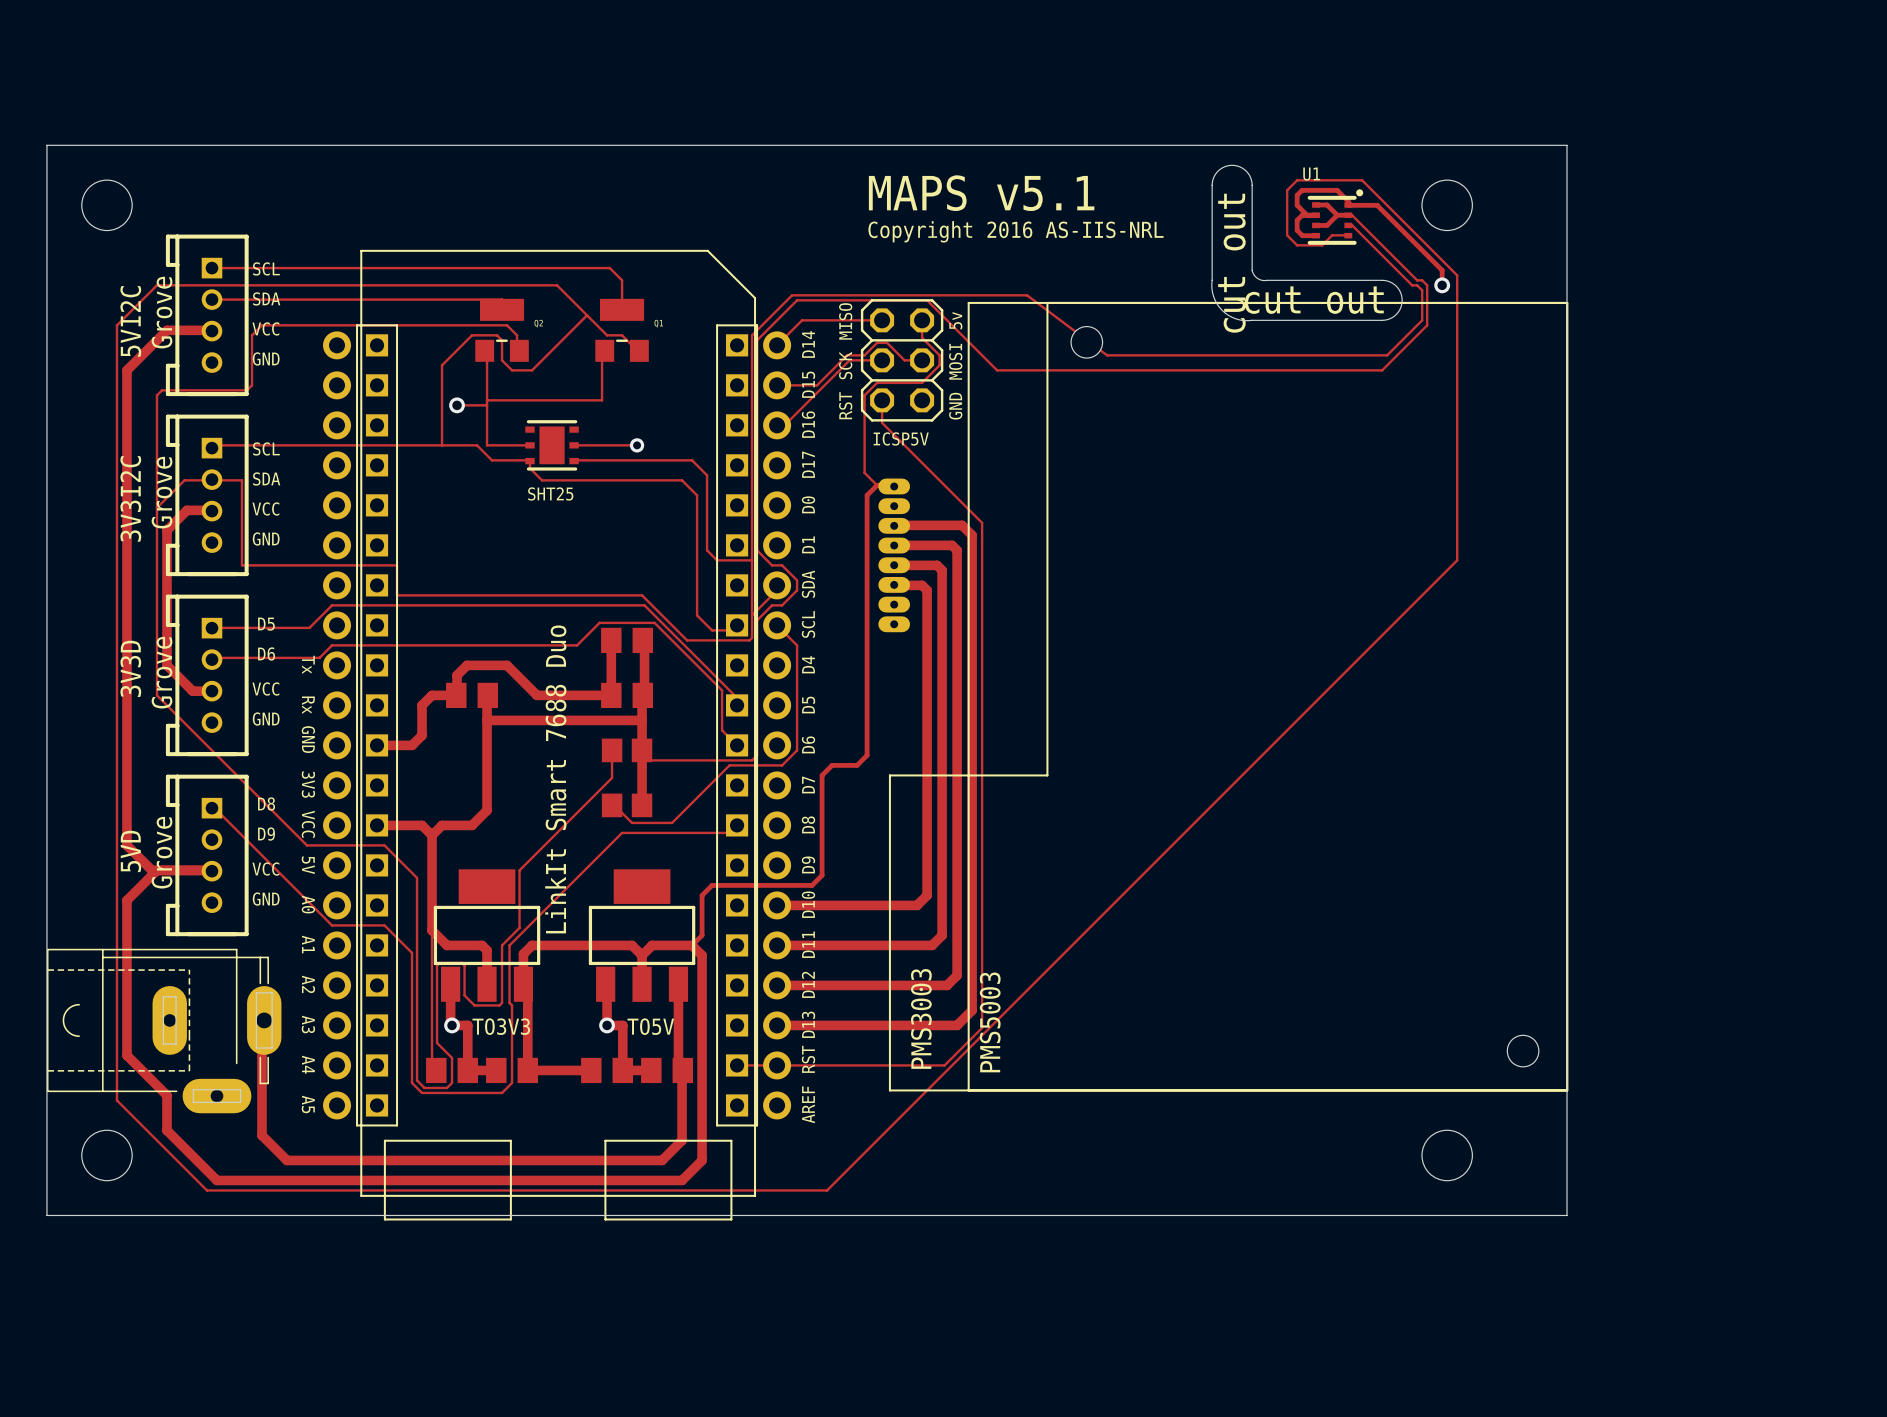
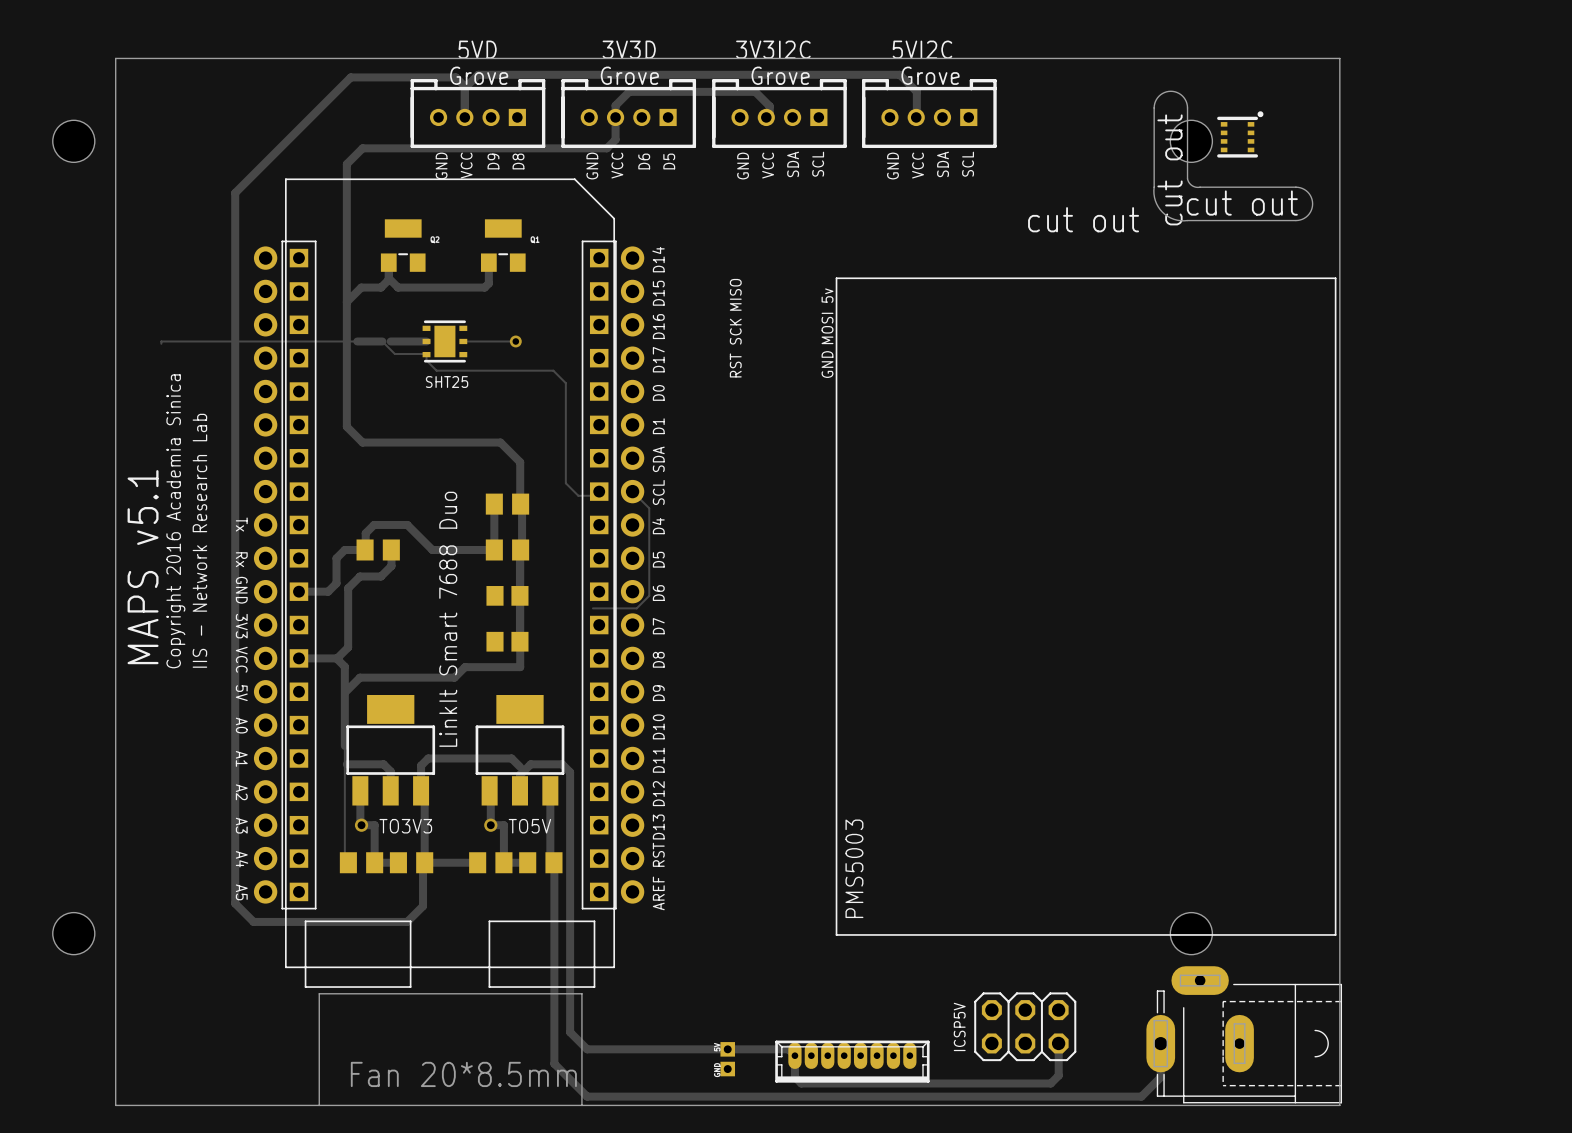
track: none -> (464, 88) (478, 74) (899, 74) (916, 91) (916, 117)
board edge: (1567, 145) (1567, 1215) (46, 1215) (46, 145) (1567, 145) -> (115, 58) (115, 1105) (1339, 1105) (1339, 58) (115, 58)
track: none -> (464, 117) (464, 86) (455, 77) (350, 77) (235, 193) (235, 903) (253, 921) (407, 921) (423, 906) (423, 864) (424, 862)
track: none -> (766, 117) (769, 114) (769, 106) (755, 91) (629, 91) (615, 105) (615, 139) (606, 148) (362, 148) (346, 164) (346, 426) (362, 442) (500, 442) (520, 462) (520, 504)
board edge: (1212, 185) (1211, 288) (1217, 303) (1228, 315) (1243, 320) (1382, 320) (1392, 317) (1398, 312) (1402, 302) (1400, 292) (1394, 284) (1387, 281) (1263, 280) (1257, 278) (1252, 270) (1250, 177) (1242, 168) (1234, 165) (1226, 166) (1216, 173) (1212, 185) -> (1154, 107) (1153, 194) (1158, 206) (1167, 216) (1180, 220) (1295, 220) (1304, 218) (1309, 214) (1312, 206) (1311, 197) (1306, 190) (1300, 187) (1197, 187) (1192, 185) (1187, 178) (1186, 101) (1179, 93) (1166, 91) (1157, 97) (1154, 107)
text: MAPS v5.1 (981, 193) -> none
part: none -> (1240, 134)
track: (1316, 204) (1327, 204) (1337, 215) -> none
track: (1315, 215) (1302, 215) (1297, 220) (1297, 230) (1302, 235) (1316, 235) -> none
track: (1316, 215) (1307, 215) (1297, 205) (1297, 195) (1302, 190) (1337, 190) (1348, 201) (1348, 205) (1377, 205) (1442, 270) (1442, 285) -> none
track: (1337, 215) (1327, 225) (1317, 225) -> none
track: (1337, 215) (1352, 215) (1417, 280) (1422, 280) (1427, 285) (1427, 325) (1382, 370) (997, 370) (927, 300) (797, 300) (757, 340) (757, 550) (772, 565) (782, 565) (797, 580) (797, 590) (782, 605) (772, 605) (757, 620) (757, 755) (752, 760) (642, 760) (642, 750) -> none
U1: (1335, 217) -> none
track: (1348, 225) (1352, 225) (1412, 285) (1417, 285) (1422, 290) (1422, 320) (1387, 355) (1107, 355) (1027, 295) (792, 295) (752, 335) (752, 637) (749, 640) (687, 640) (642, 595) (397, 595) (397, 565) (242, 565) (242, 480) (184, 480) (156, 507) -> none
text: Copyright 2016 AS-IIS-NRL (1015, 231) -> none
text: none -> D9 (493, 161)
text: none -> D8 (518, 161)
text: none -> D6 (644, 161)
text: none -> D5 (669, 161)
5VI2C footprint: [165, 234, 249, 397] -> [862, 79, 997, 149]
track: (1348, 235) (1332, 235) (1322, 245) (1297, 245) (1287, 235) (1287, 190) (1297, 180) (1362, 180) (1457, 275) (1457, 560) (827, 1190) (206, 1190) (116, 1100) (116, 325) (156, 285) (557, 285) (607, 335) (622, 335) (639, 350) -> none
text: none -> cut out (1170, 169)
text: cut out (1231, 263) -> none
track: (211, 268) (609, 268) (622, 280) (622, 309) -> none
text: none -> cut out (1242, 203)
via: (1442, 285) -> none
track: (211, 299) (502, 299) (502, 309) -> none
track: (587, 315) (532, 370) (512, 370) (502, 360) (502, 340) (497, 335) (472, 335) (442, 365) (442, 445) -> none
track: (882, 320) (802, 320) (777, 345) -> none
track: (922, 320) (922, 337) (939, 355) (939, 365) (922, 382) (877, 382) (864, 395) (864, 472) (877, 485) -> none
text position: 5v (955, 320) -> 5v (827, 295)
5VI2C name position: 5VI2C (130, 321) -> 5VI2C (922, 49)
text position: MISO (845, 321) -> MISO (735, 294)
track: (211, 331) (166, 330) (126, 370) (126, 845) (151, 870) (211, 870) -> none
track: (484, 350) (487, 350) (487, 445) -> (388, 262) (388, 279) (381, 287) (361, 287) (346, 302)
track: (519, 350) (517, 350) (517, 335) (507, 325) (262, 325) (252, 335) (252, 385) (247, 390) (161, 390) (156, 395) (156, 695) (307, 845) (384, 845) (417, 877) (417, 1080) (424, 1087) (447, 1087) (452, 1082) (452, 1057) (437, 1042) (437, 965) (439, 962) (462, 962) (464, 965) (464, 995) (474, 1005) (499, 1005) (502, 1002) (502, 945) (519, 927) (519, 870) (612, 777) (612, 750) -> none
track: (604, 350) (602, 350) (602, 400) (487, 400) -> (488, 262) (488, 283) (484, 287) (398, 287) (388, 278) (388, 262)
track: (882, 360) (849, 360) (784, 425) (777, 425) -> none
ICSP5V rotation: 0° (902, 360) -> 90° clockwise (1025, 1026)
ICSP5V position: (902, 360) -> (1025, 1026)
track: (922, 360) (904, 360) (887, 342) (877, 342) (864, 355) (847, 355) (817, 385) (777, 385) -> none
text position: MOSI (955, 361) -> MOSI (827, 328)
text position: SCK (845, 365) -> SCK (735, 331)
track: (882, 400) (882, 422) (982, 522) (982, 1027) (944, 1065) (737, 1065) -> none
track: (457, 405) (487, 405) -> none
via: (457, 405) -> none
text position: RST (845, 405) -> RST (735, 365)
text position: GND (955, 406) -> GND (827, 364)
3V3I2C footprint: [165, 414, 249, 577] -> [712, 79, 847, 149]
track width: thin (446, 445) (477, 445) -> thick (357, 341) (382, 341)
track width: thin (487, 445) (529, 445) -> thick (390, 341) (426, 341)
track: (574, 461) (692, 460) (707, 475) (707, 550) (717, 560) (752, 560) -> none
track: (877, 485) (867, 495) (867, 755) (857, 765) (832, 765) (822, 775) (822, 875) (812, 885) (712, 885) (702, 895) (702, 935) (692, 945) -> none
3V3I2C name position: 3V3I2C (130, 498) -> 3V3I2C (773, 49)
track: (211, 511) (186, 510) (166, 530) (166, 665) (192, 691) (211, 691) -> none
track: (894, 525) (962, 525) (972, 535) (972, 1010) (957, 1025) (777, 1025) -> none
track: (894, 545) (952, 545) (957, 550) (957, 975) (947, 985) (777, 985) -> none
part: (894, 555) -> none
track: (894, 565) (937, 565) (942, 570) (942, 935) (932, 945) (777, 945) -> none
track: (894, 584) (922, 585) (927, 590) (927, 895) (917, 905) (777, 905) -> none
track: (777, 585) (777, 590) (752, 615) -> none
3V3D footprint: [165, 594, 249, 757] -> [561, 79, 697, 149]
text: D5 (266, 624) -> none
track: (211, 627) (309, 627) (332, 605) (644, 605) (737, 697) (737, 705) -> none
text: D6 (266, 654) -> none
track: (211, 659) (211, 657) (319, 657) (332, 645) (577, 645) (599, 622) (654, 622) (722, 690) (722, 730) (737, 745) -> none
text: none -> Copyright 2016 Academia Sinica (175, 521)
3V3D name position: 3V3D (130, 668) -> 3V3D (629, 49)
text: none -> IIS - Network Research Lab (199, 540)
track: (487, 695) (487, 810) (472, 825) (442, 825) (432, 835) -> (391, 550) (391, 566) (381, 576) (359, 576) (348, 588) (348, 647) (336, 658)
track: none -> (520, 549) (520, 667) (465, 667) (454, 677) (359, 677) (346, 690)
part: (1228, 696) -> none
drawing position: (1267, 696) -> (1086, 606)
track: (487, 720) (642, 720) -> none
text: none -> MAPS v5.1 (143, 567)
track: (729, 765) (672, 822) (632, 822) (614, 805) -> none
5VD footprint: [165, 774, 249, 937] -> [410, 79, 546, 149]
text: D8 (266, 804) -> none
track: (211, 808) (211, 810) (216, 810) (332, 925) (384, 925) (412, 952) (412, 1082) (422, 1092) (502, 1092) (512, 1082) (509, 945) (622, 832) (729, 832) (737, 825) -> none
text: D9 (266, 834) -> none
5VD name position: 5VD (130, 851) -> 5VD (477, 49)
track: (156, 870) (126, 900) (126, 1055) (166, 1095) (166, 1130) (216, 1180) (682, 1180) (702, 1160) (702, 955) (692, 945) -> none
track: (432, 930) (447, 945) (482, 945) (487, 950) (487, 960) -> (346, 764) (383, 764) (390, 771)
track: (692, 945) (652, 945) (642, 955) (642, 964) -> (1058, 1043) (1058, 1075) (1050, 1083) (801, 1083) (794, 1077) (794, 1055) (788, 1049) (587, 1049) (570, 1032) (570, 772) (562, 764) (530, 764) (519, 775)
track: (264, 1020) (262, 1020) (262, 1135) (287, 1160) (662, 1160) (682, 1140) (682, 1070) -> (1160, 1043) (1160, 1077) (1141, 1096) (587, 1096) (554, 1063) (553, 862)
part: (164, 1031) -> none
part: none -> (1244, 1034)
part: none -> (727, 1059)
part: none -> (852, 1061)
text: none -> Fan 20*8.5mm (463, 1074)
board edge: none -> (319, 1105) (319, 993) (581, 993) (581, 1105)

